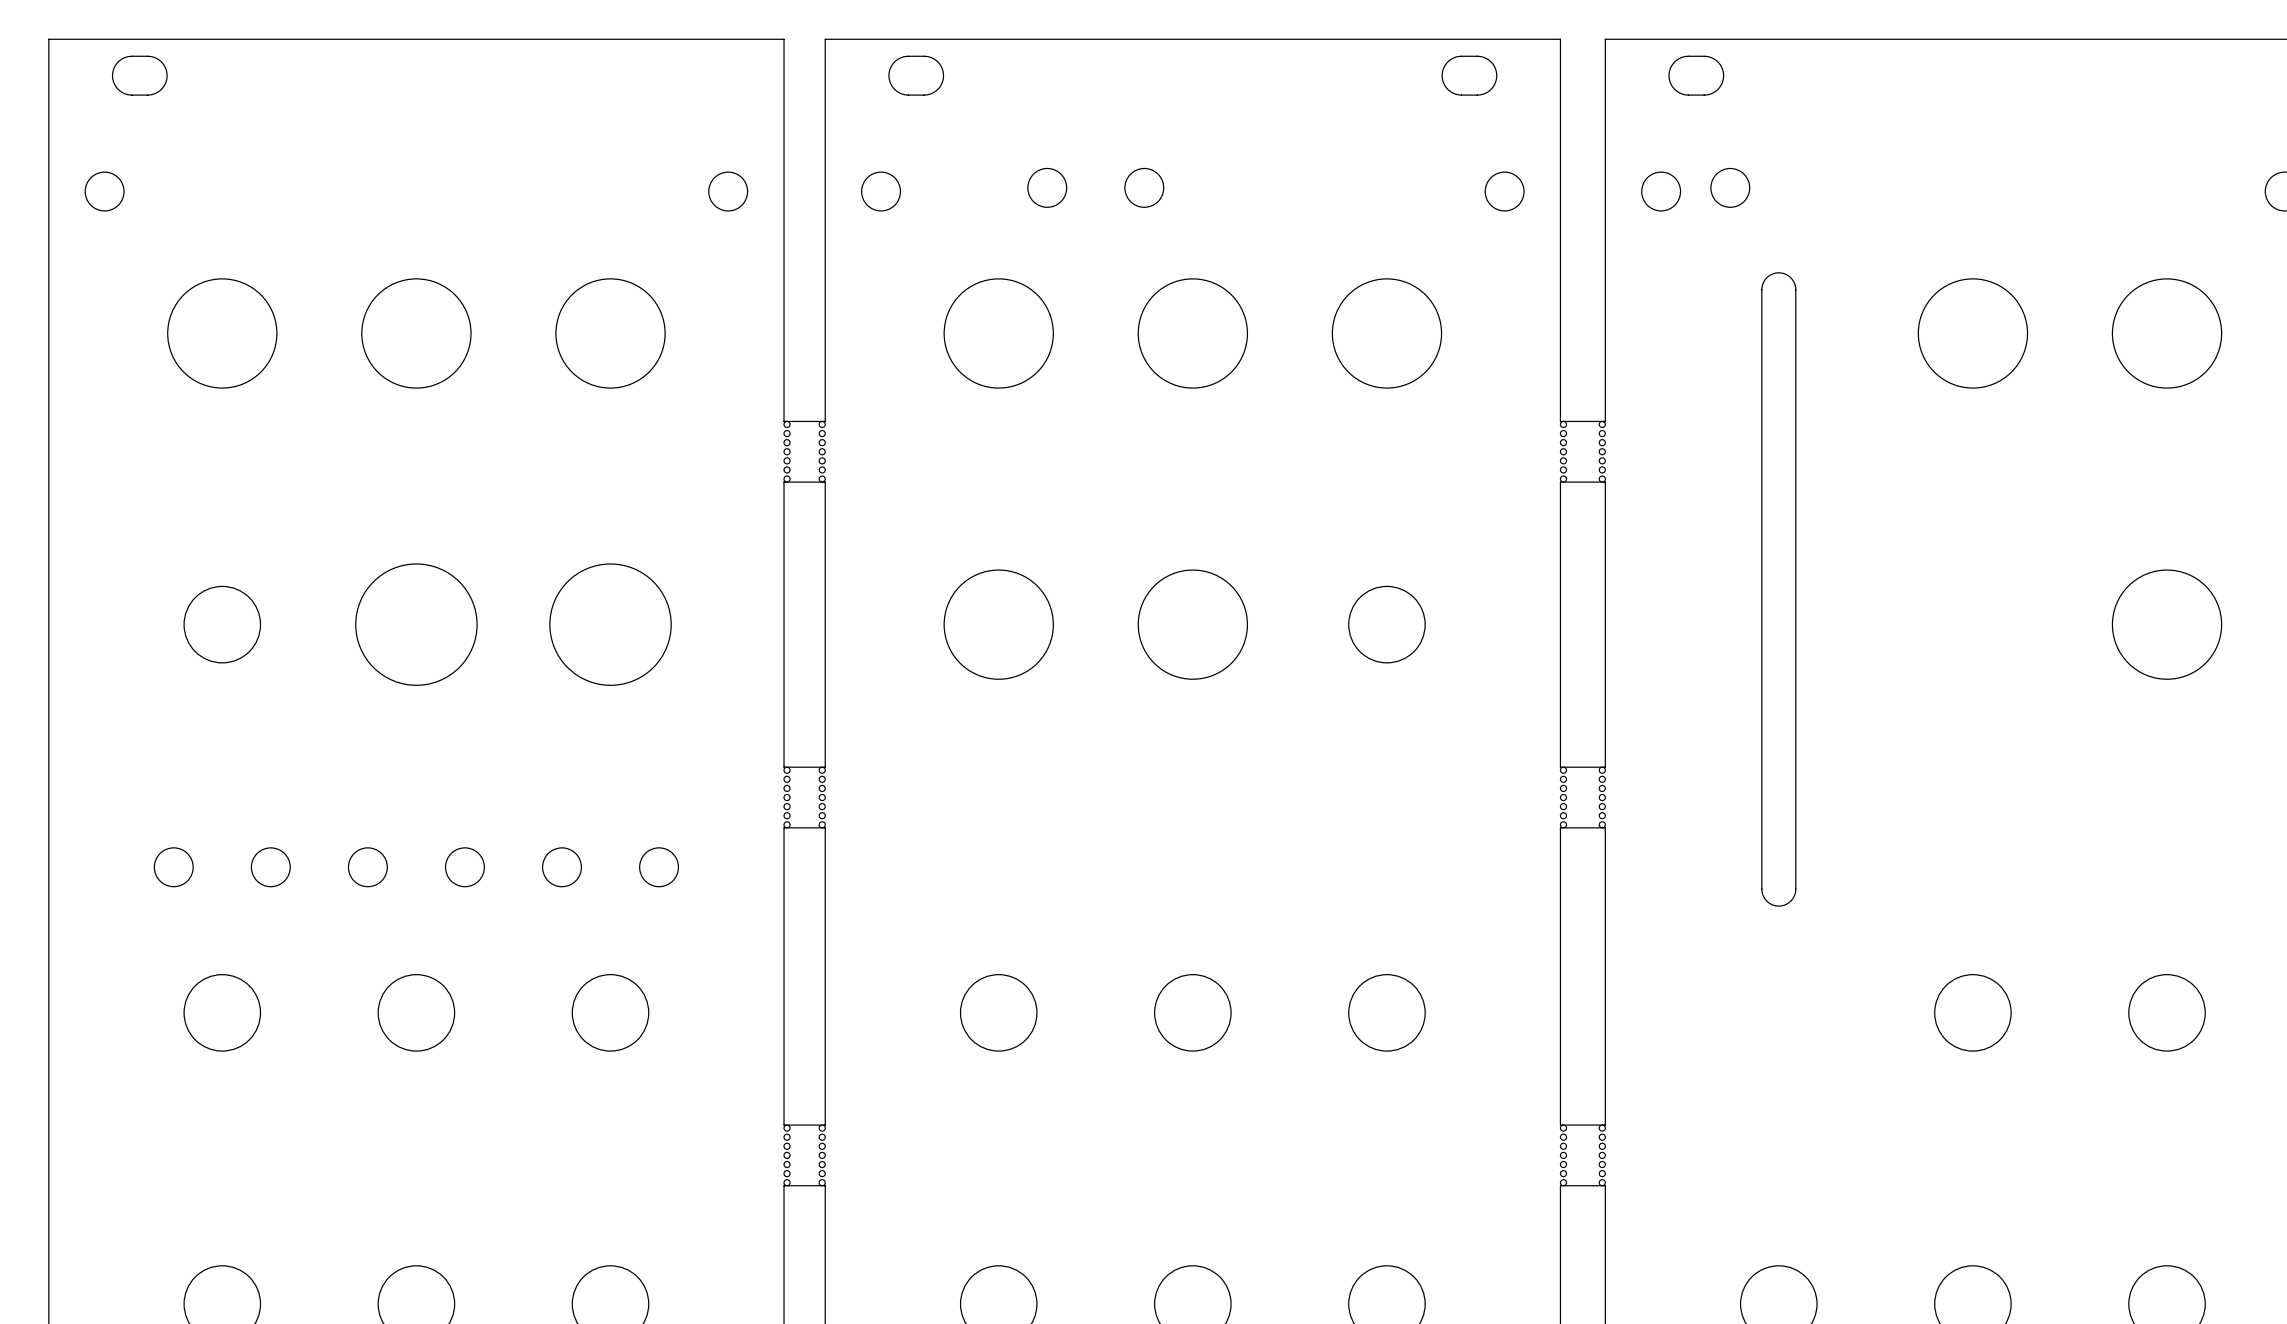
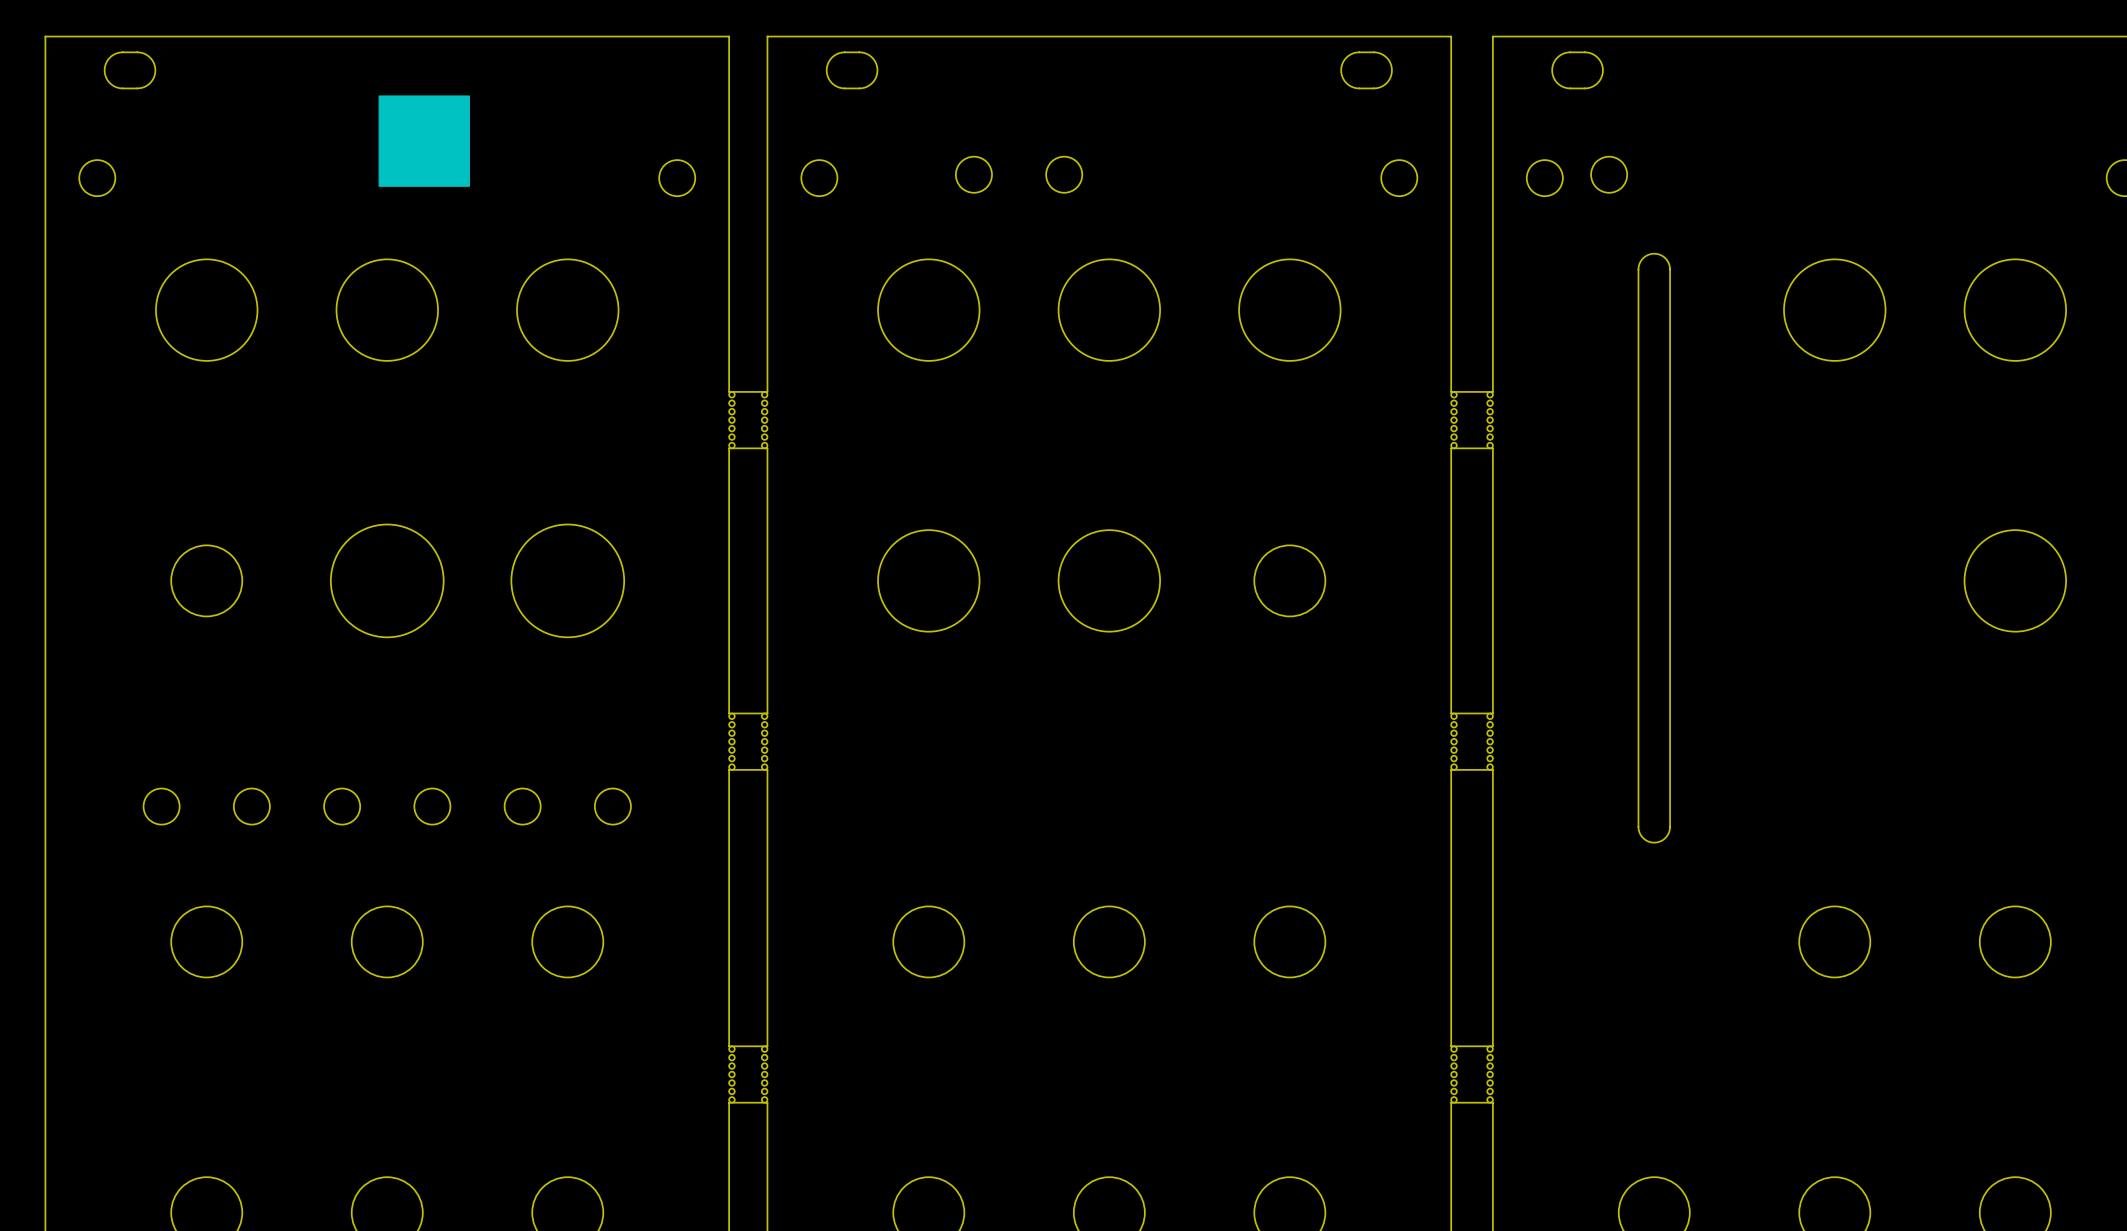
drawing: none -> [378, 95, 470, 187]

